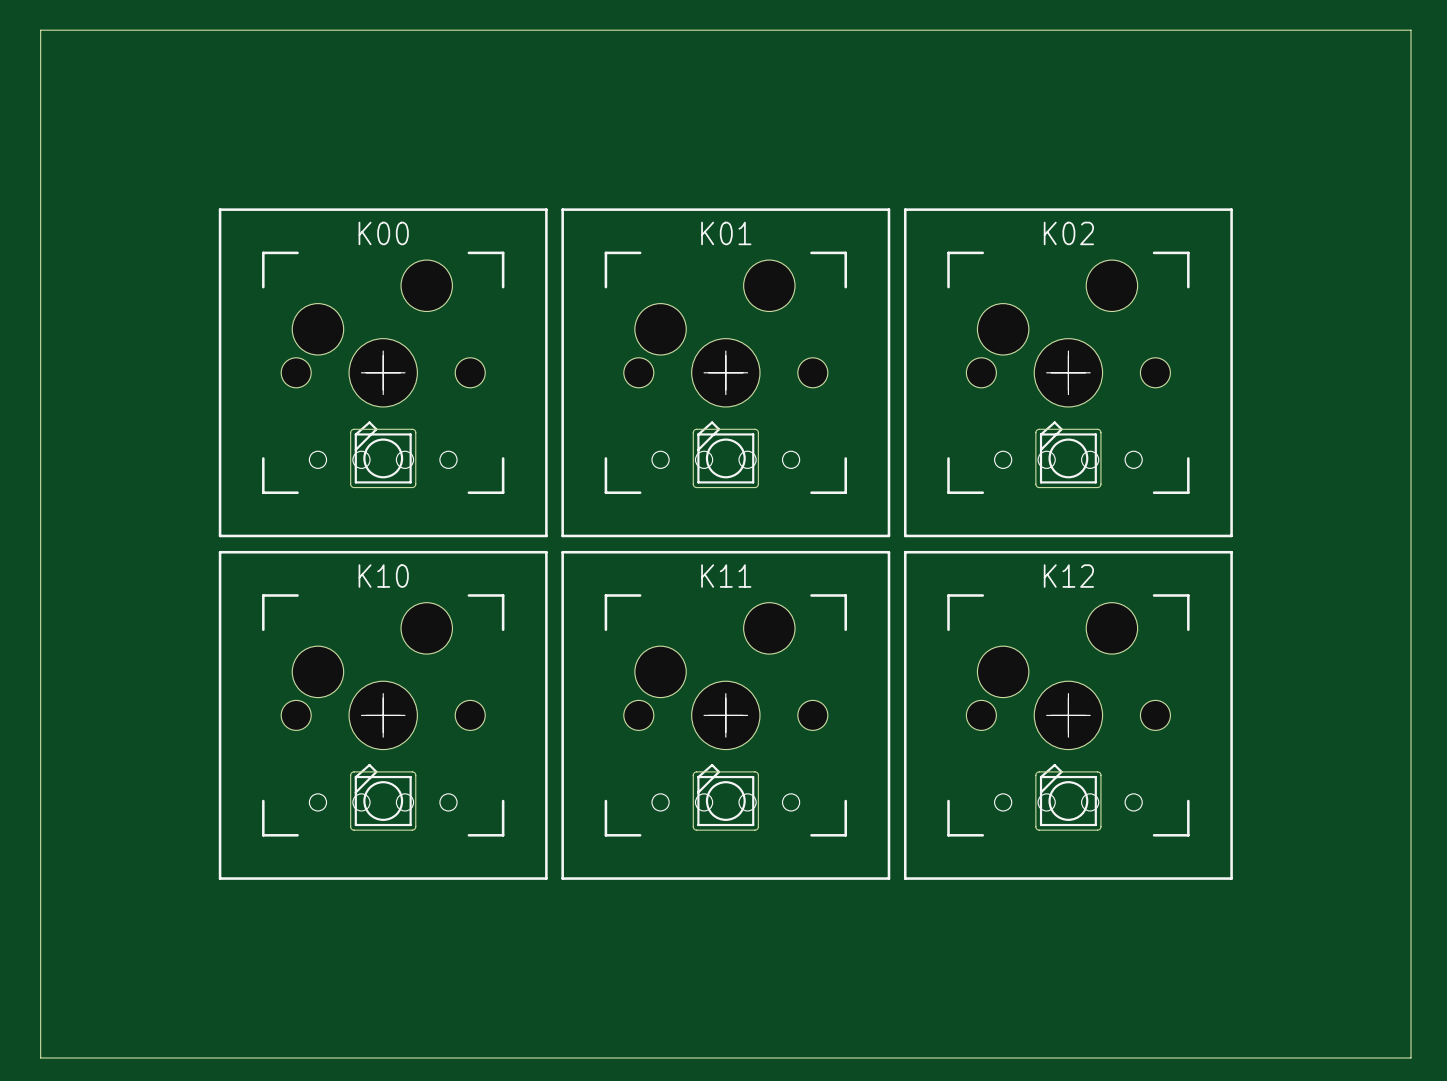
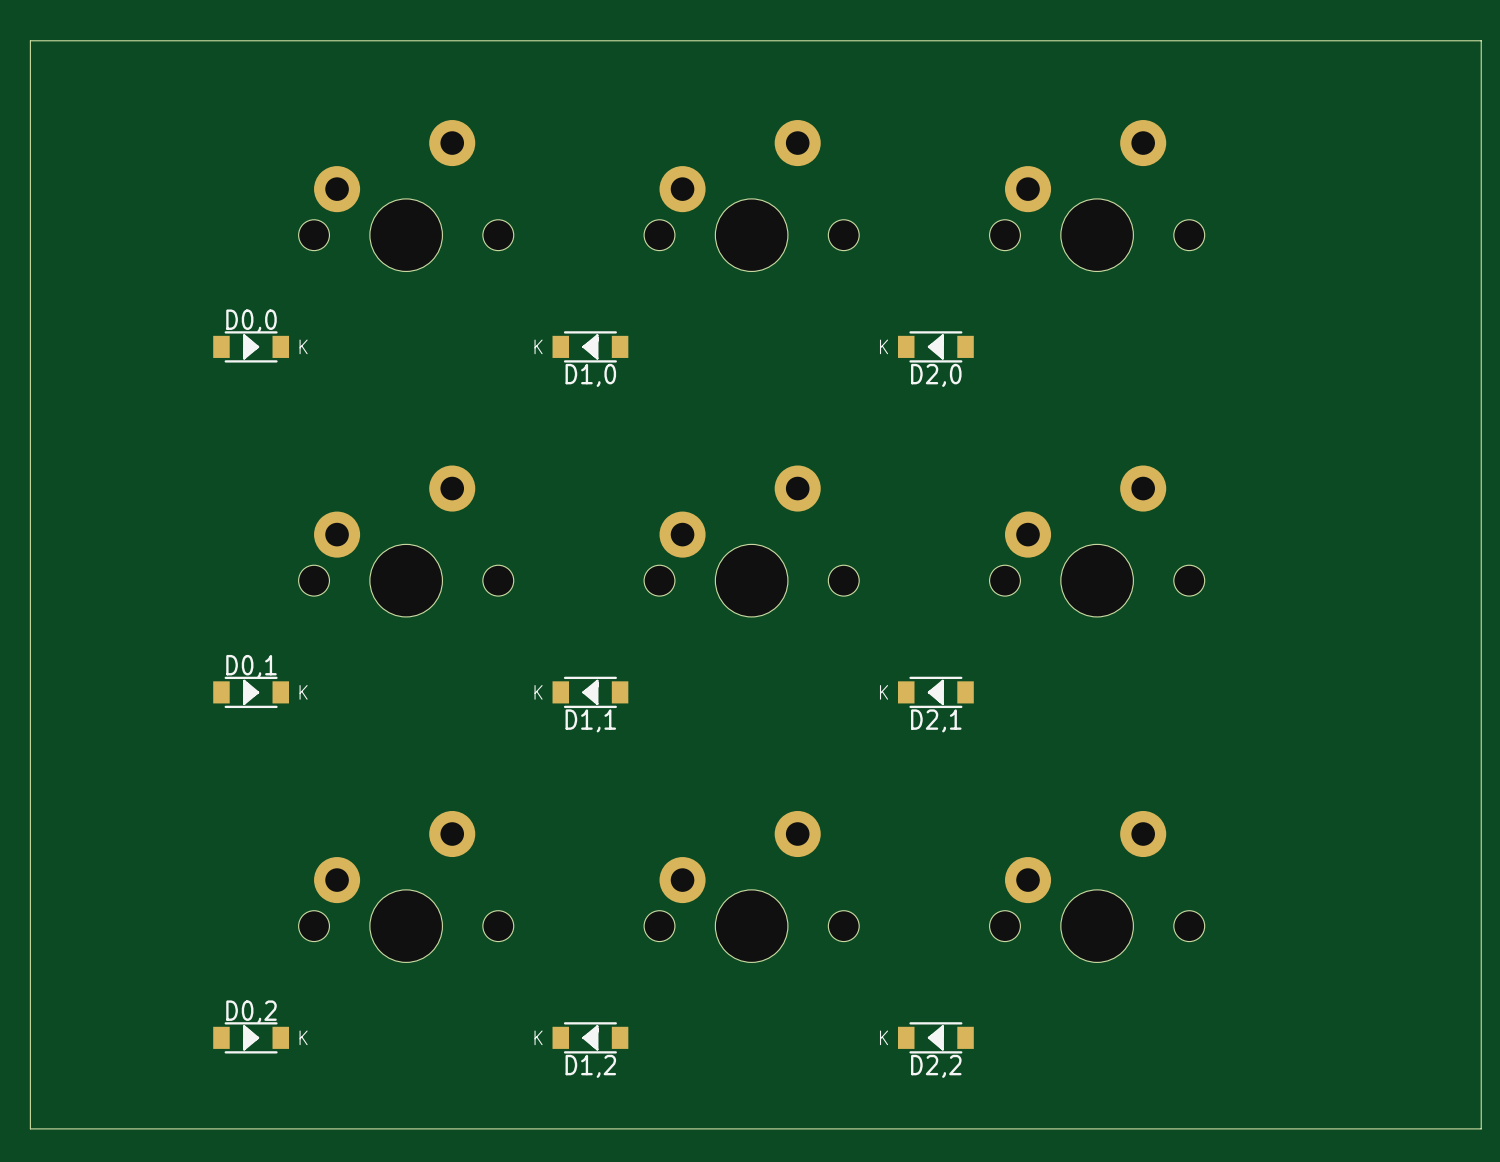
part: none -> (406, 195)
part: none -> (751, 195)
part: none -> (1097, 195)
drawing: [218, 208, 1233, 880] -> none
D0,0: none -> (251, 346)
D1,0: none -> (590, 346)
D2,0: none -> (935, 346)
K00: (383, 372) -> none
K01: (725, 372) -> none
K02: (1068, 372) -> none
part: (383, 454) -> none
part: (725, 454) -> none
part: (1068, 454) -> none
part: none -> (406, 541)
part: none -> (751, 541)
part: none -> (1097, 541)
D0,1: none -> (251, 692)
D1,1: none -> (590, 692)
D2,1: none -> (935, 692)
K10: (383, 715) -> none
K11: (725, 715) -> none
K12: (1068, 715) -> none
part: (383, 797) -> none
part: (725, 797) -> none
part: (1068, 797) -> none
part: none -> (406, 886)
part: none -> (751, 886)
part: none -> (1097, 886)
D0,2: none -> (251, 1037)
D1,2: none -> (590, 1037)
D2,2: none -> (935, 1037)

